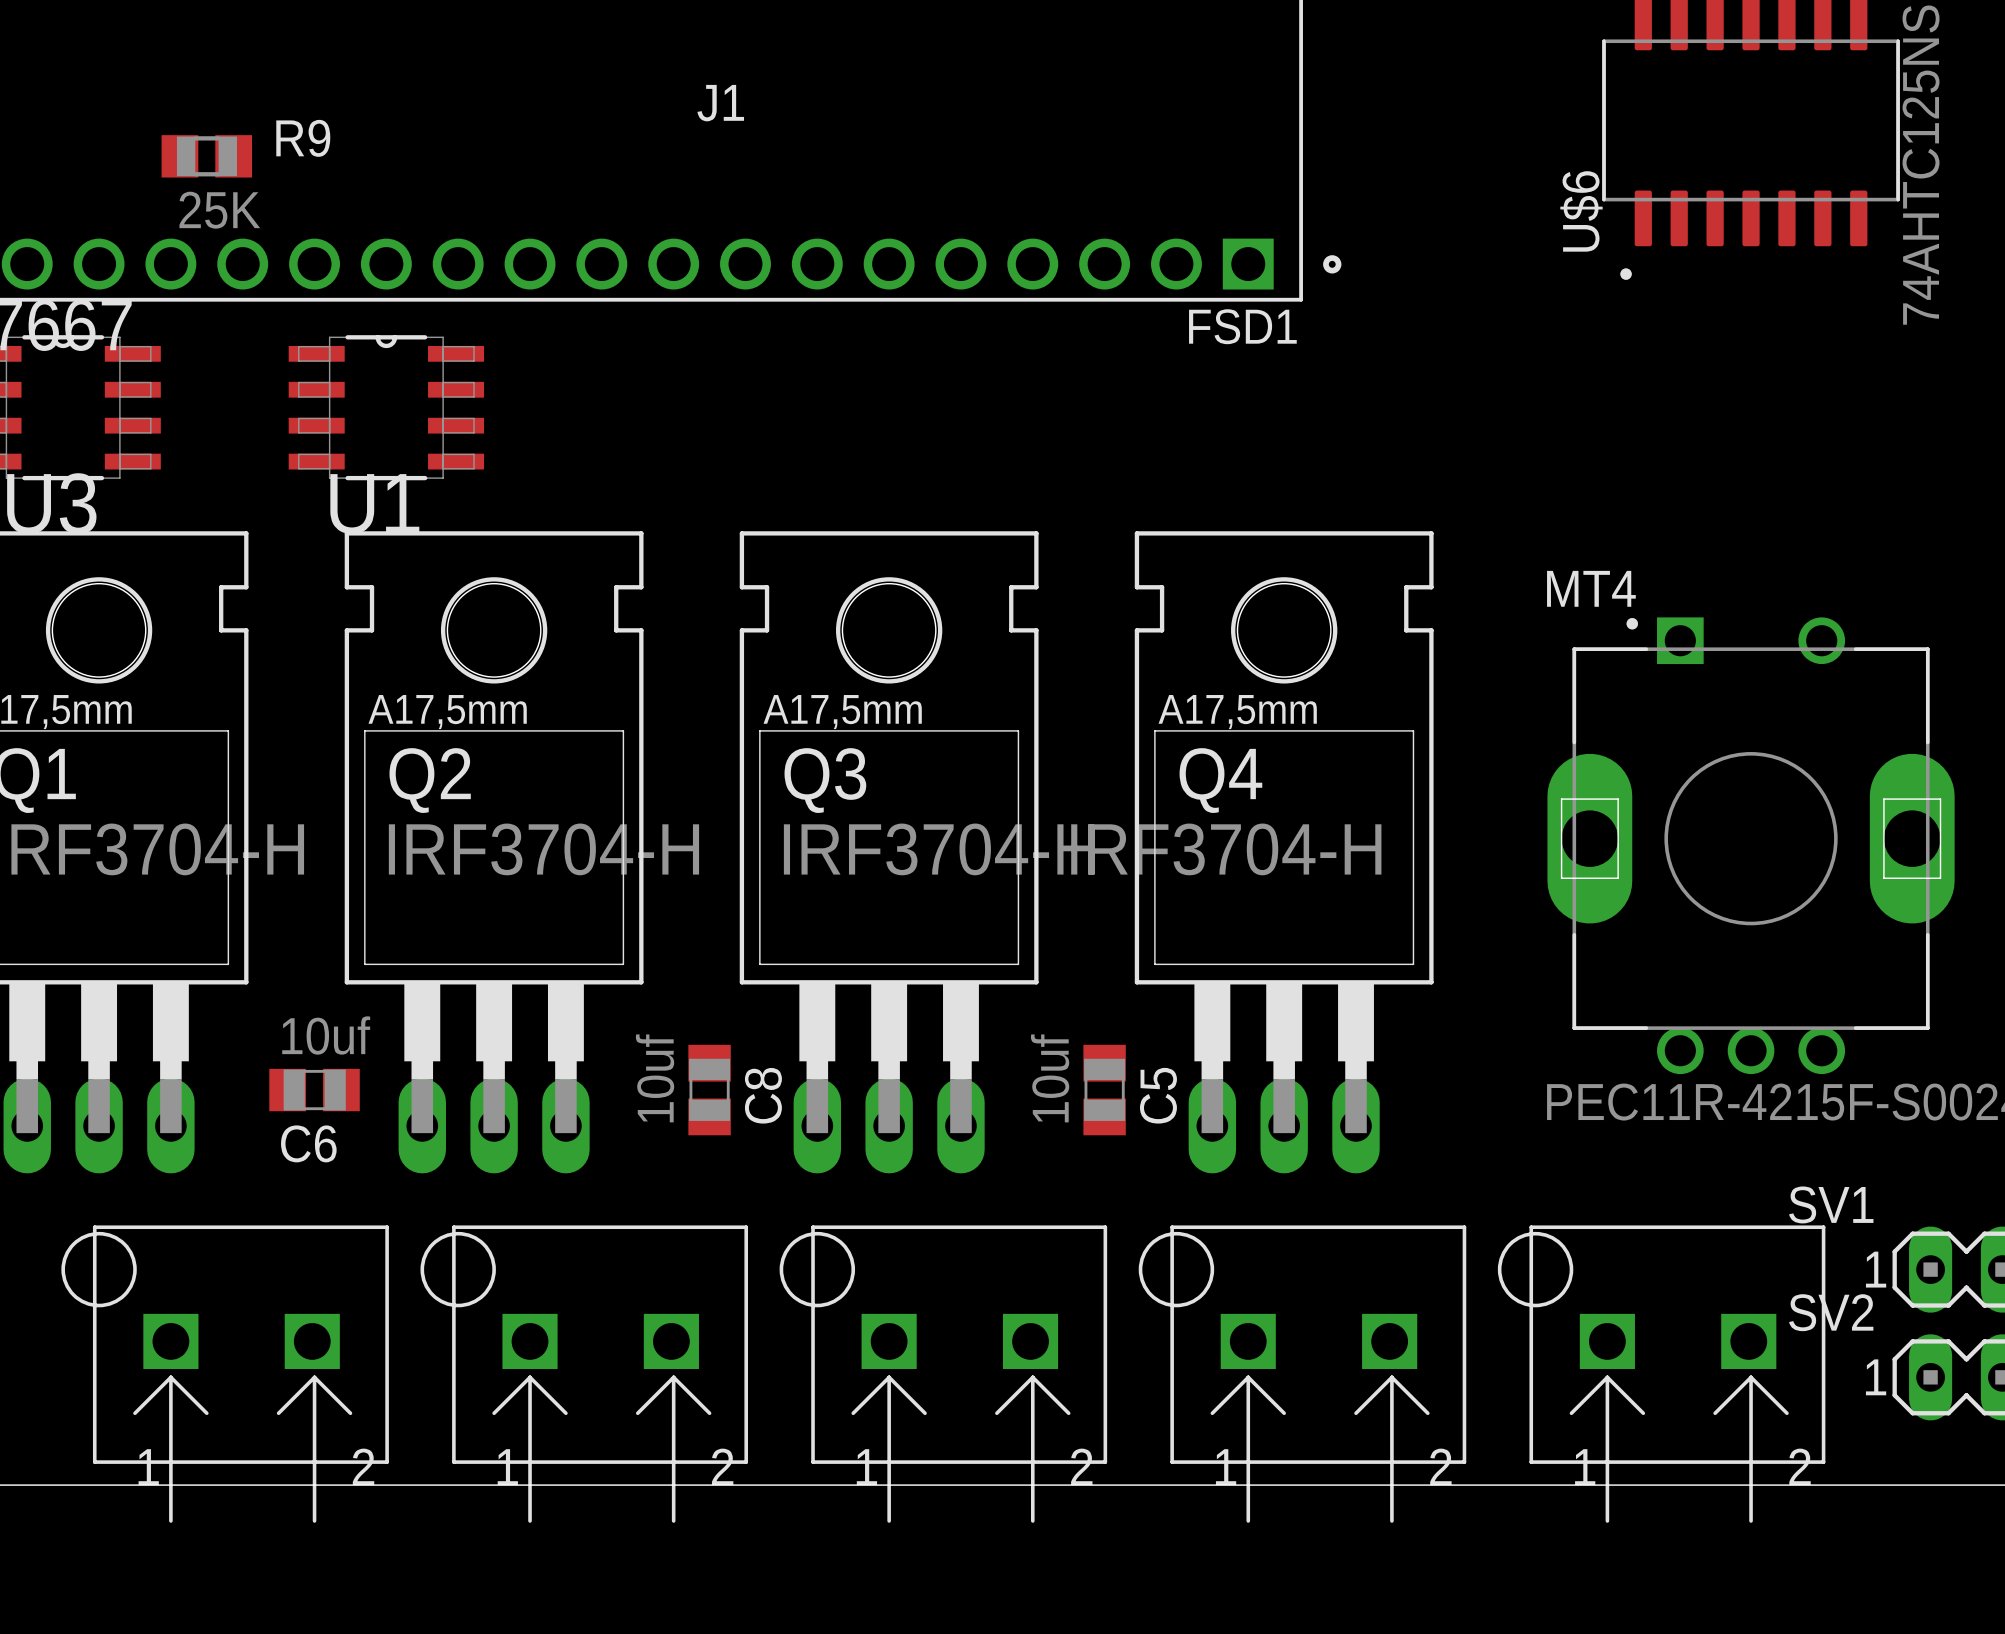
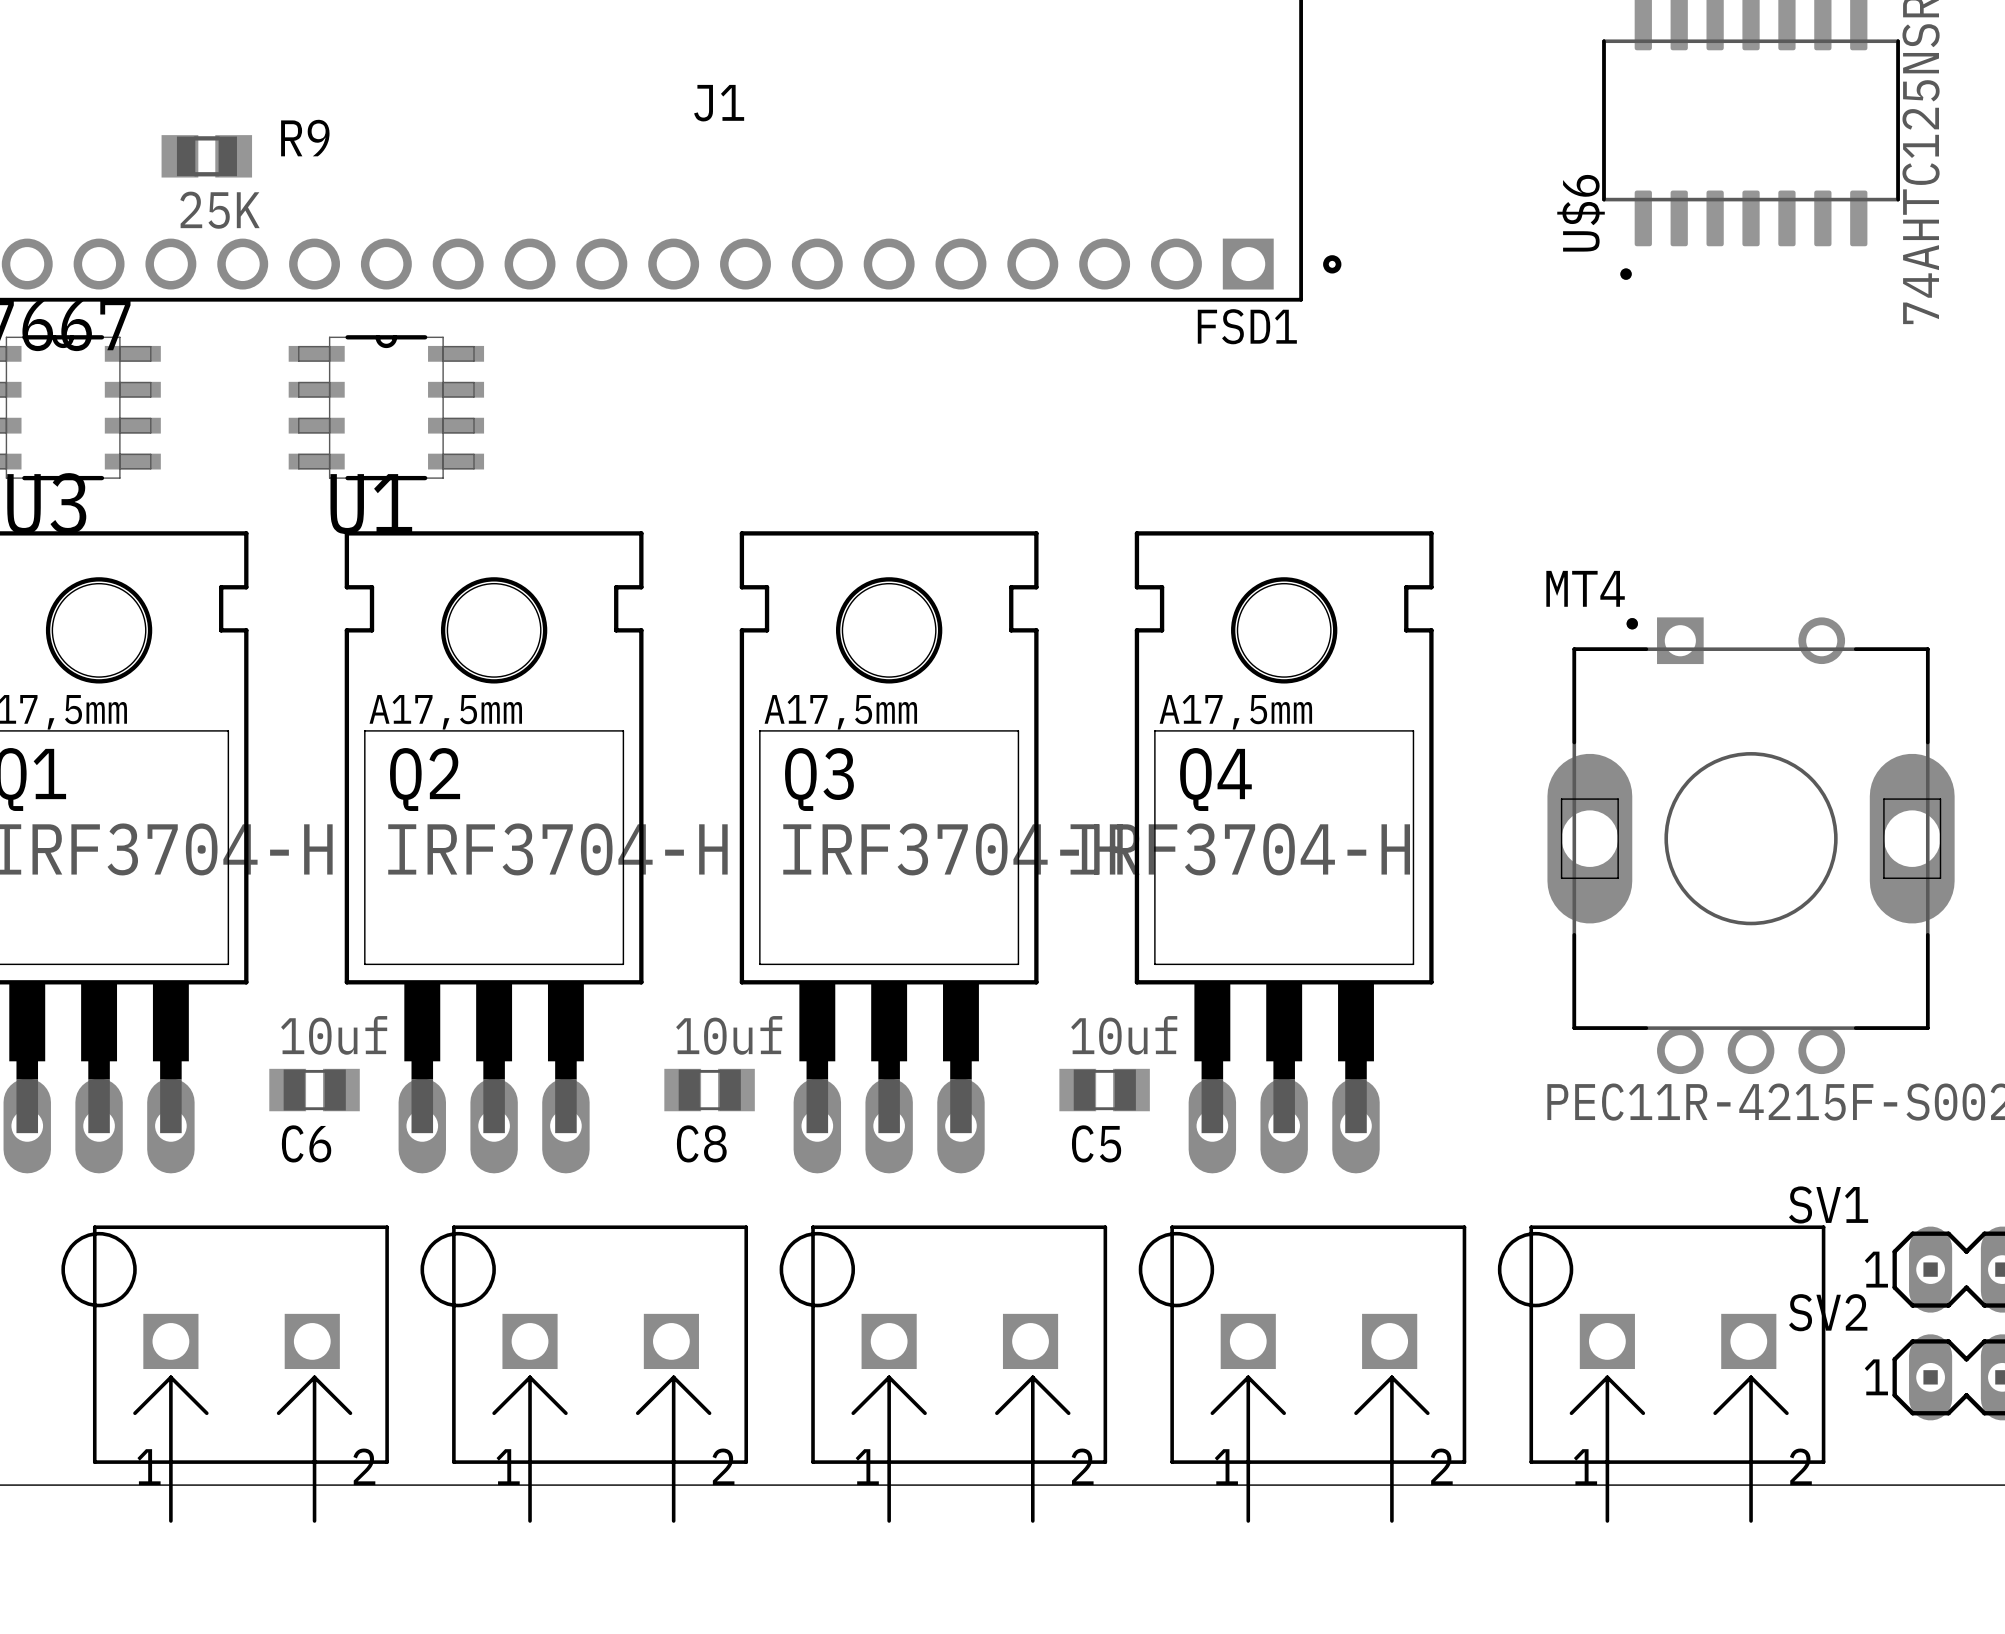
C8 rotation: 0° (709, 1090) -> 90° clockwise (709, 1090)
C5 rotation: 0° (1104, 1090) -> 90° clockwise (1104, 1090)

